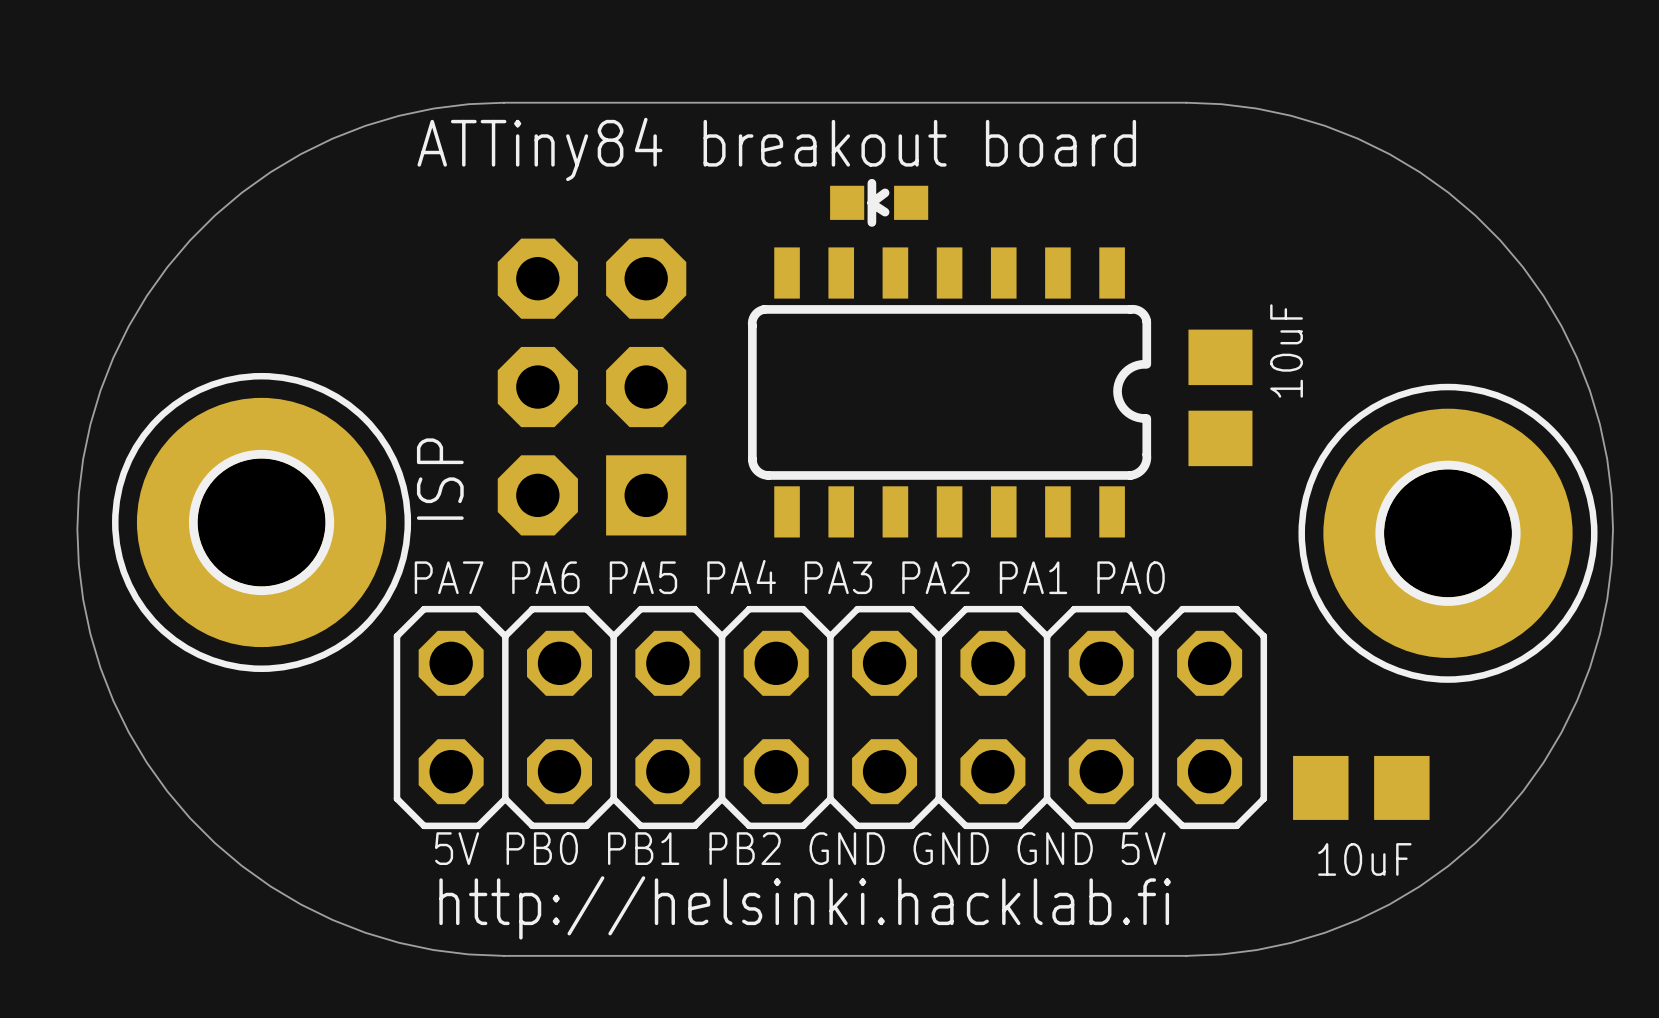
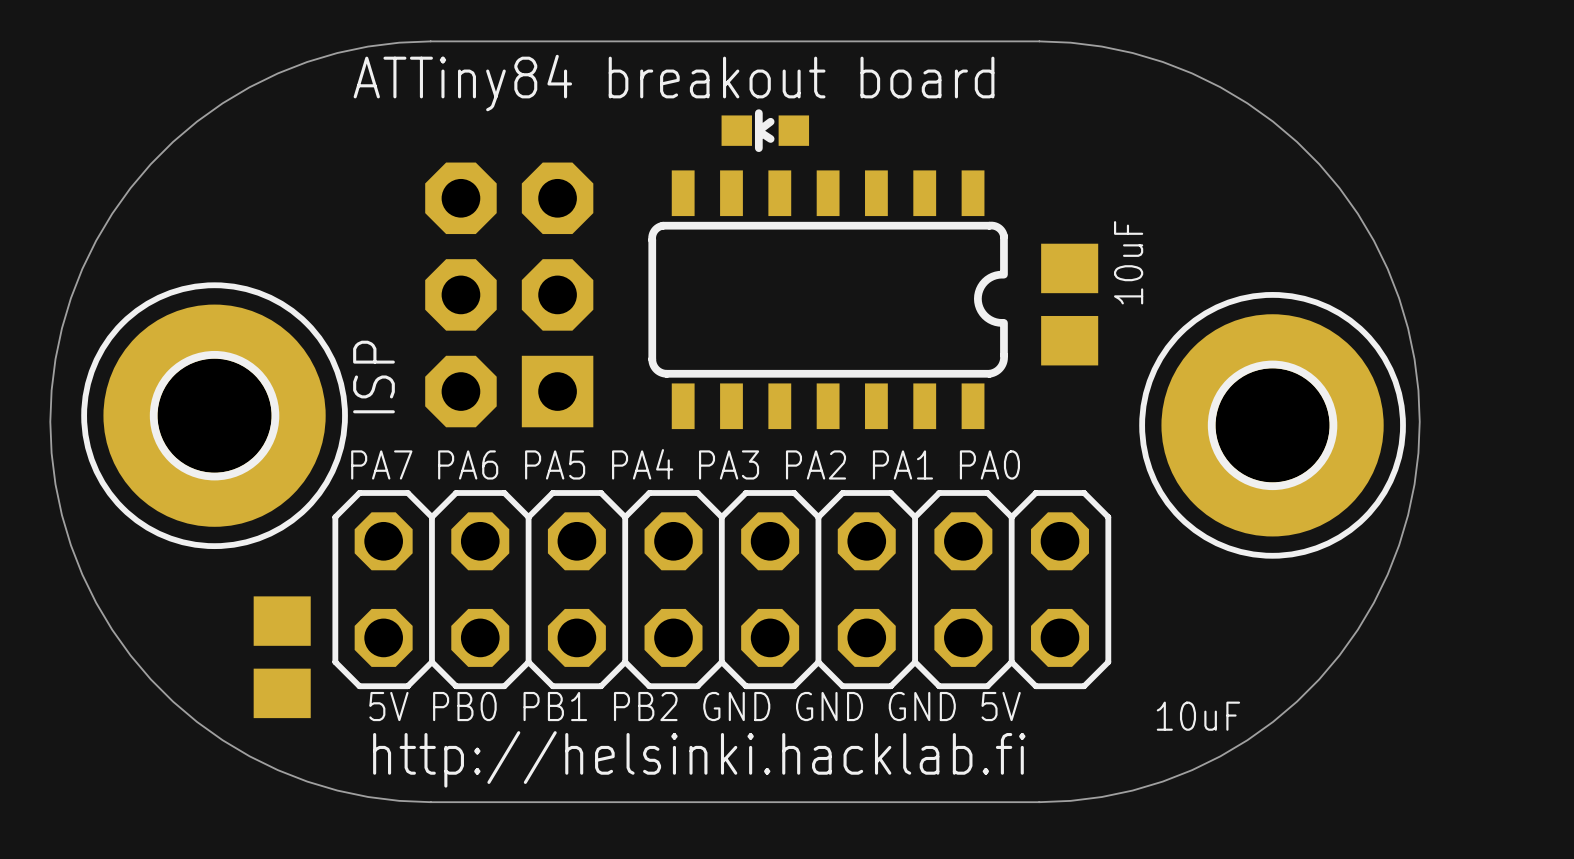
part rotation: 0° (1361, 787) -> 90° clockwise (282, 657)
part position: (1361, 787) -> (282, 657)

